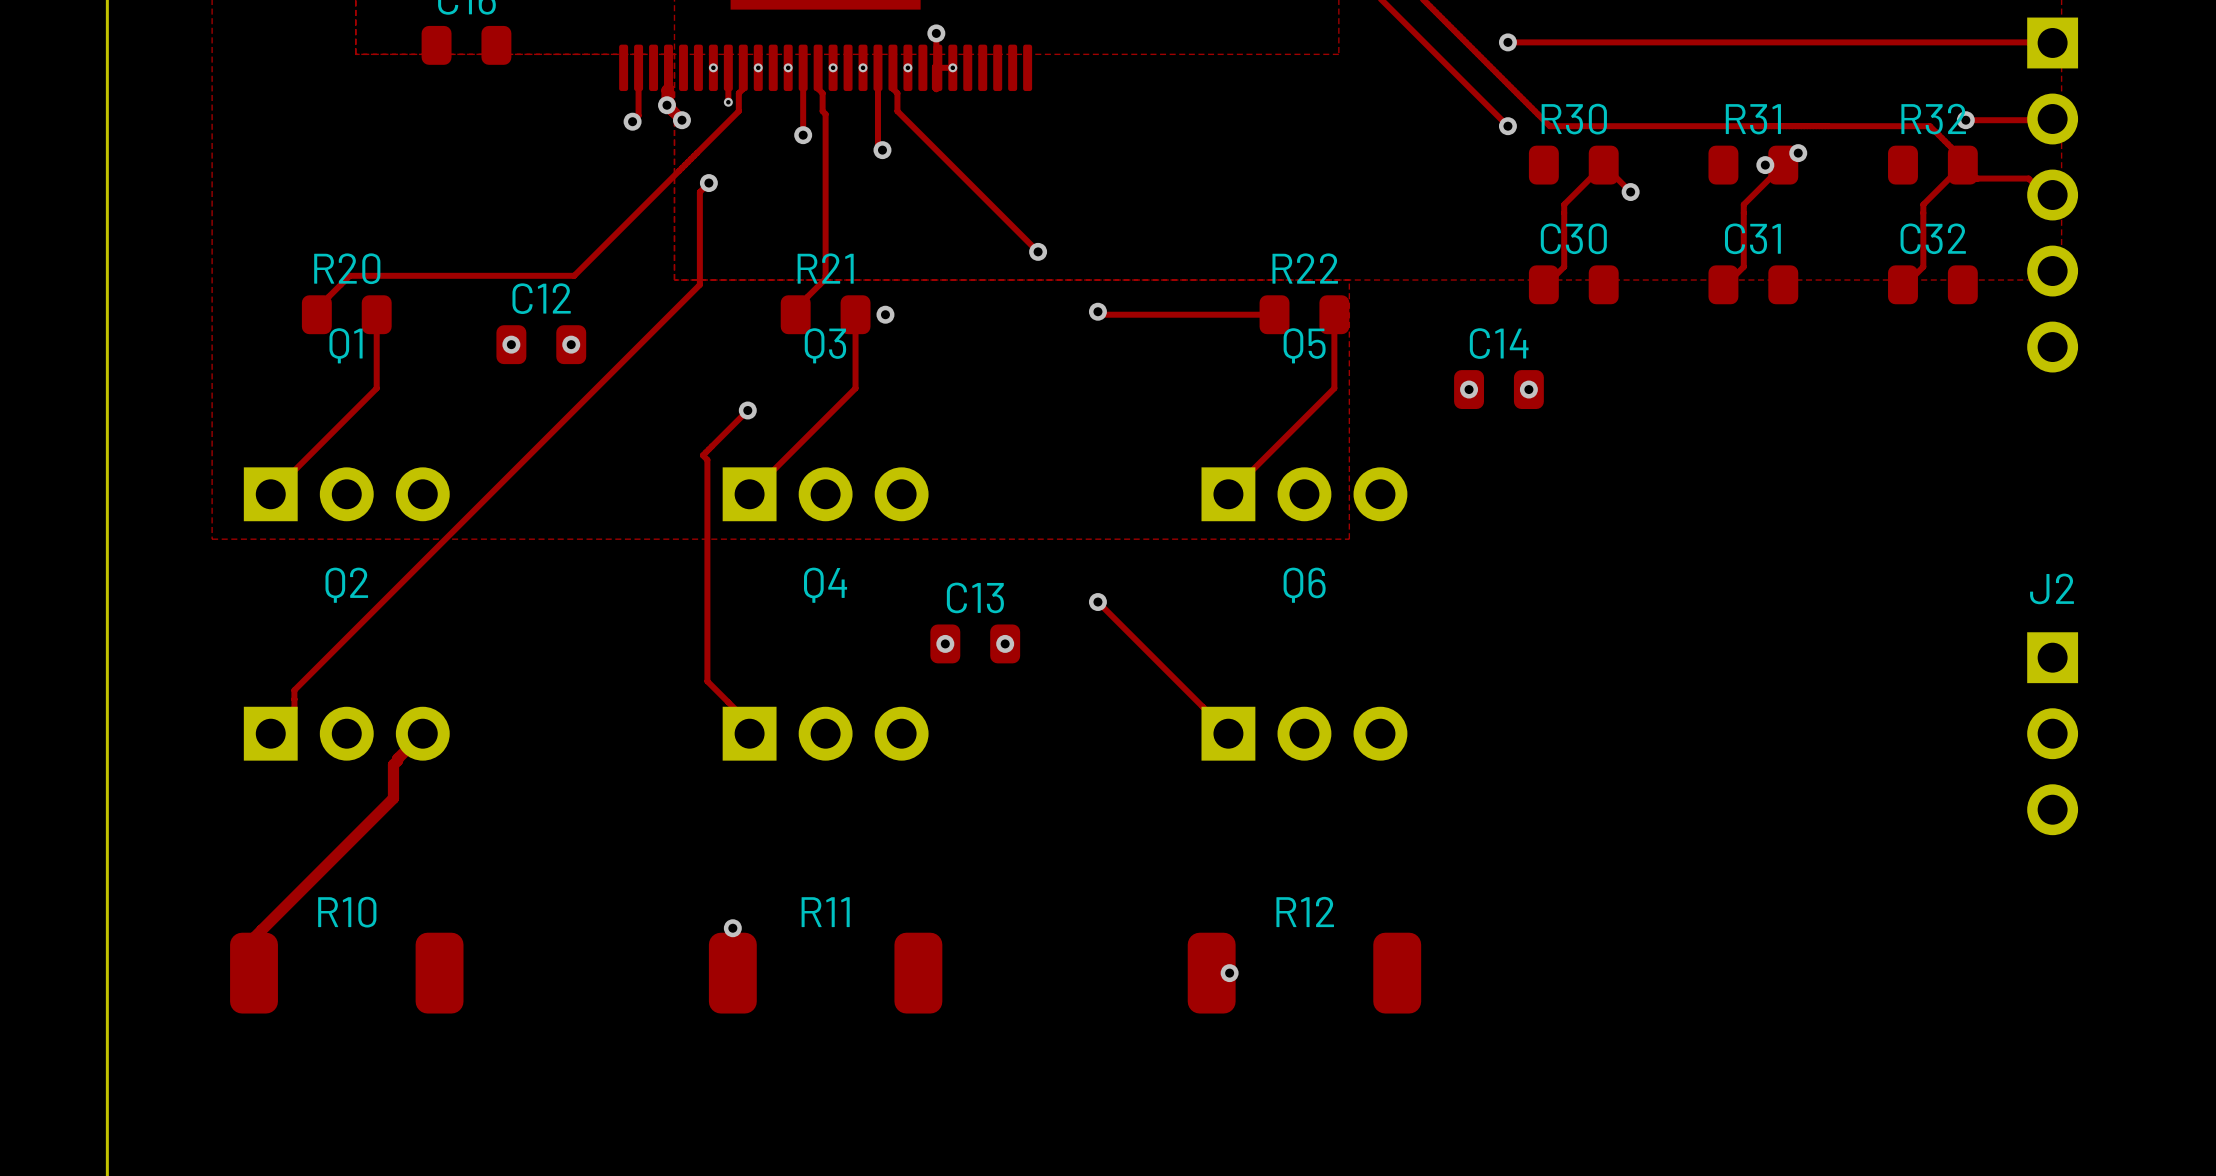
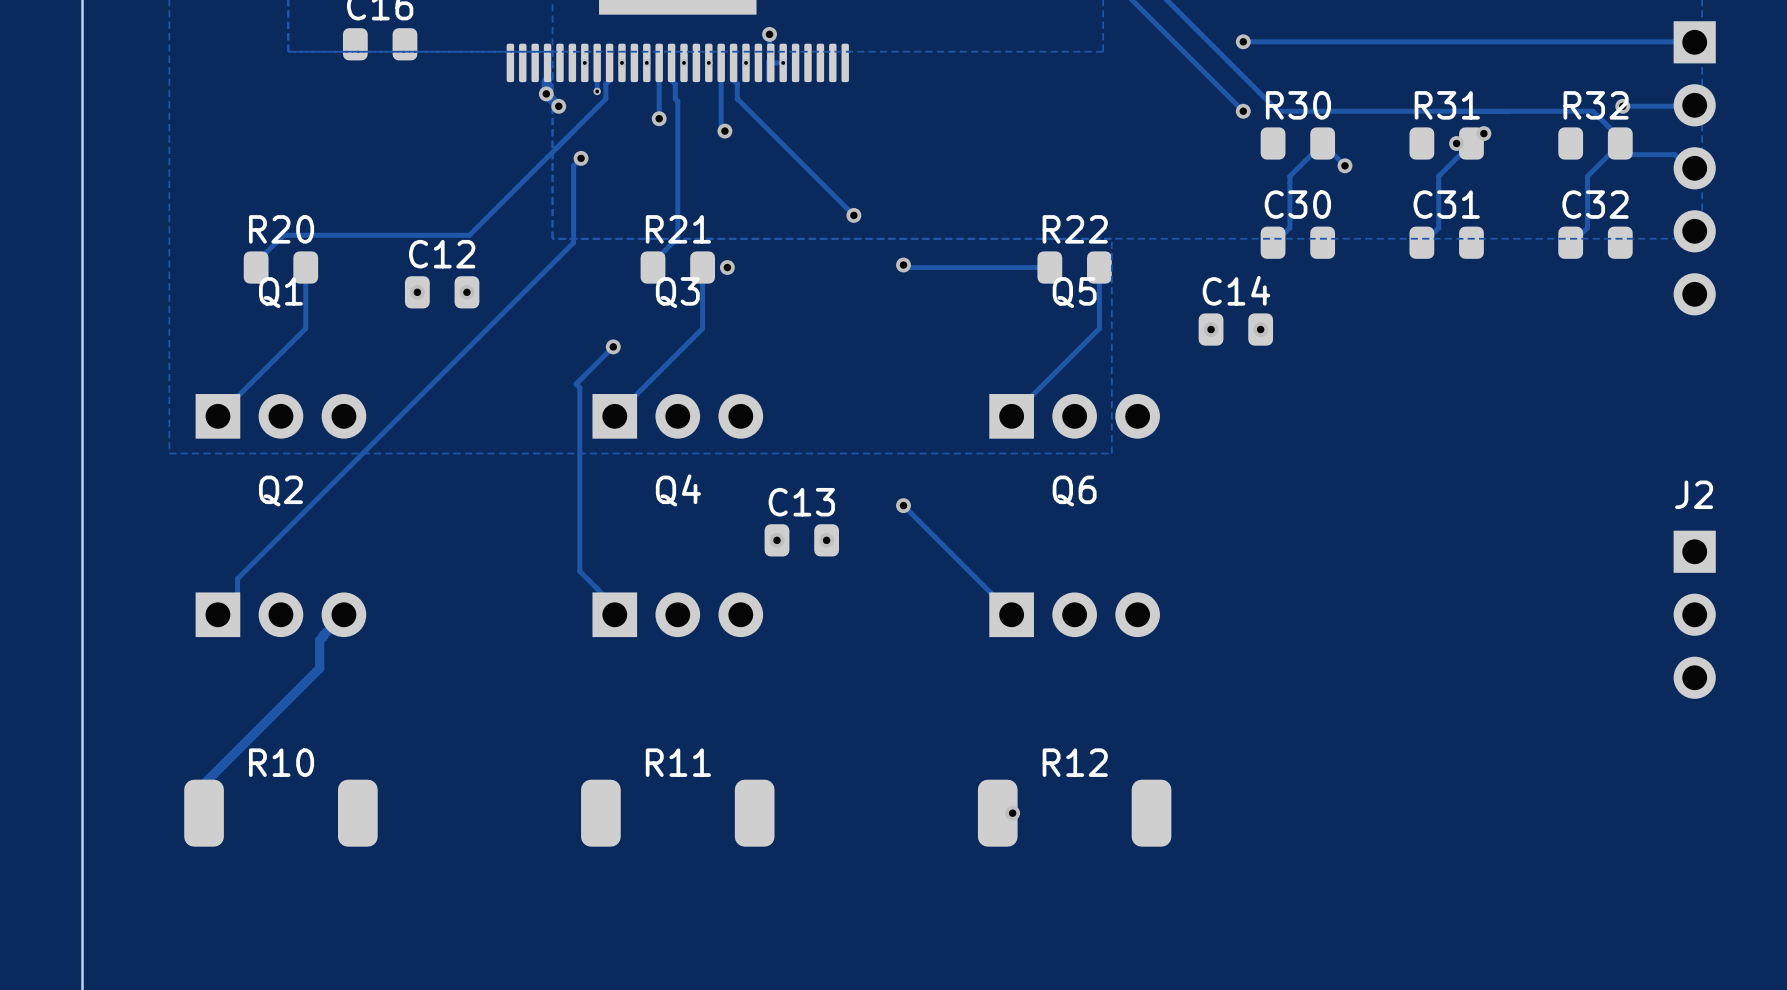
track: (638, 88) (638, 115) (632, 121) -> none
via: (632, 121) -> none
via: (732, 928) -> none

